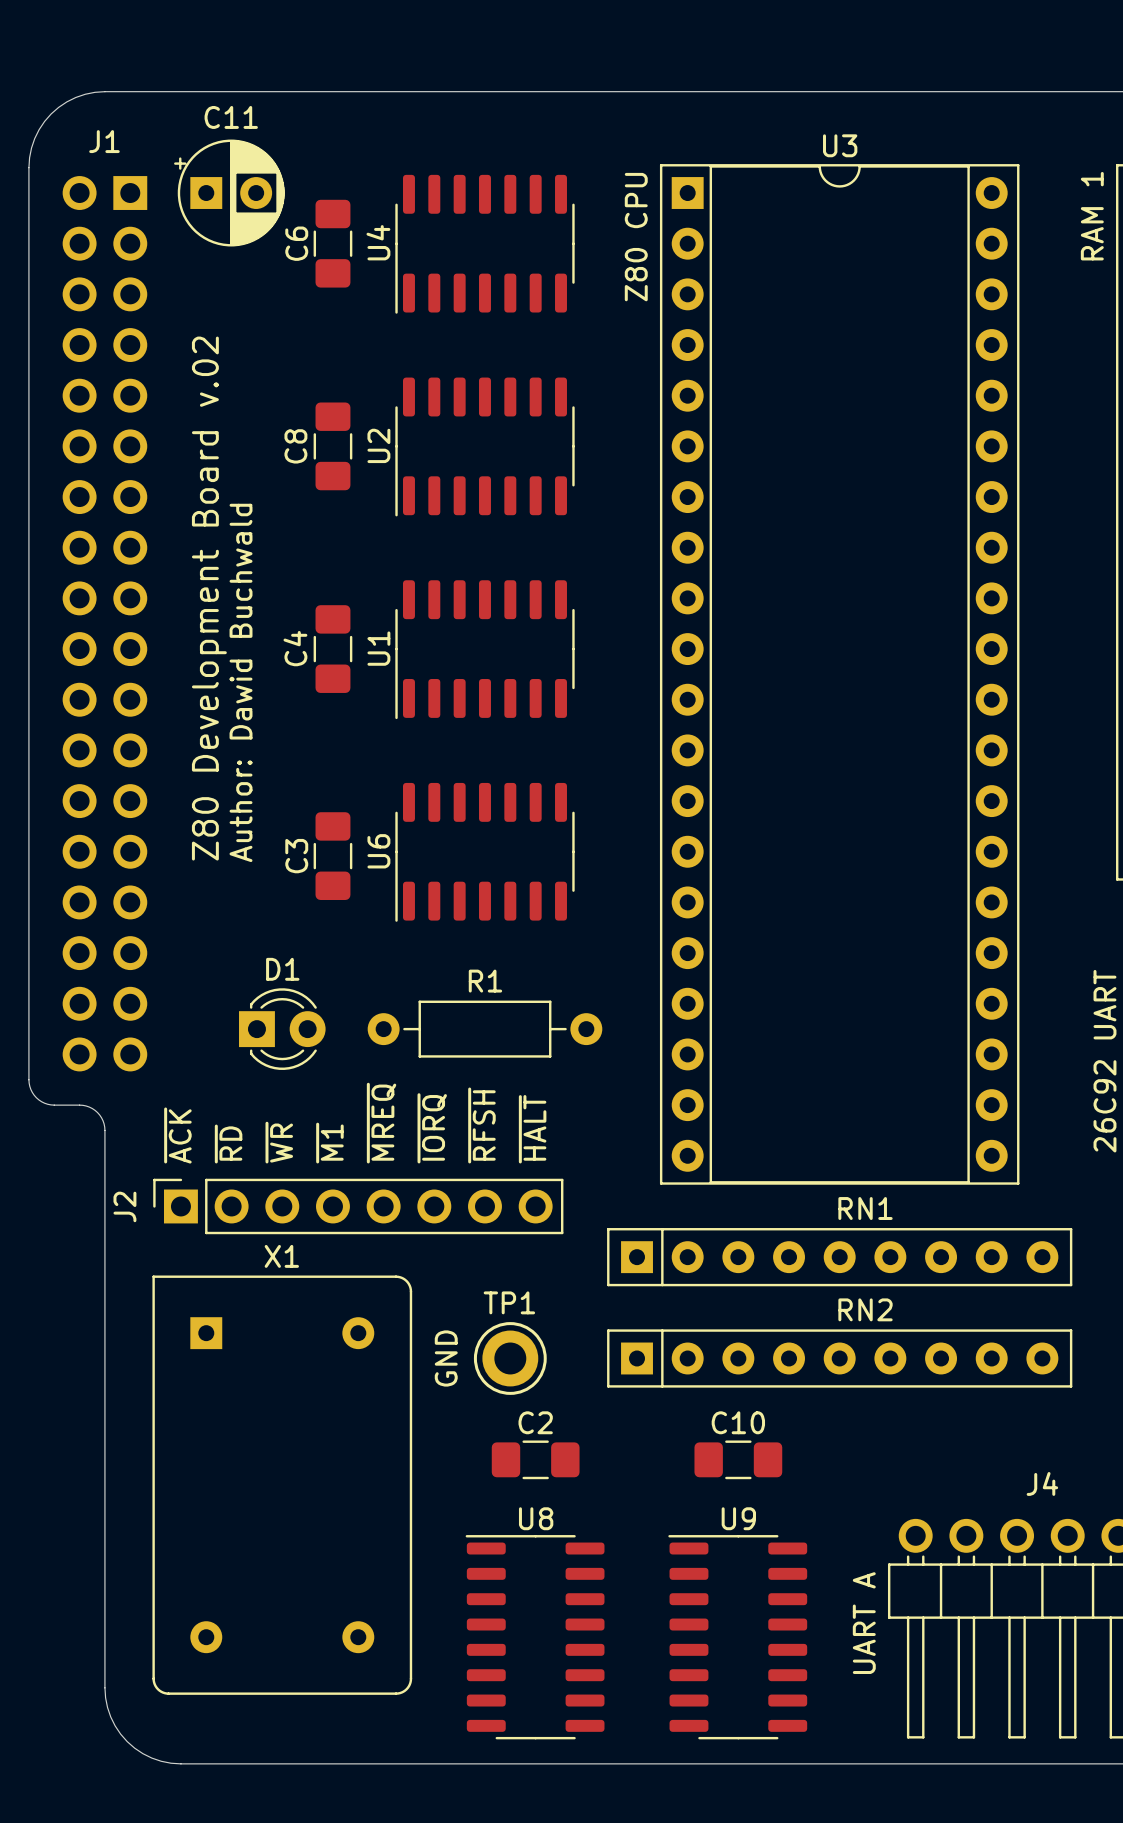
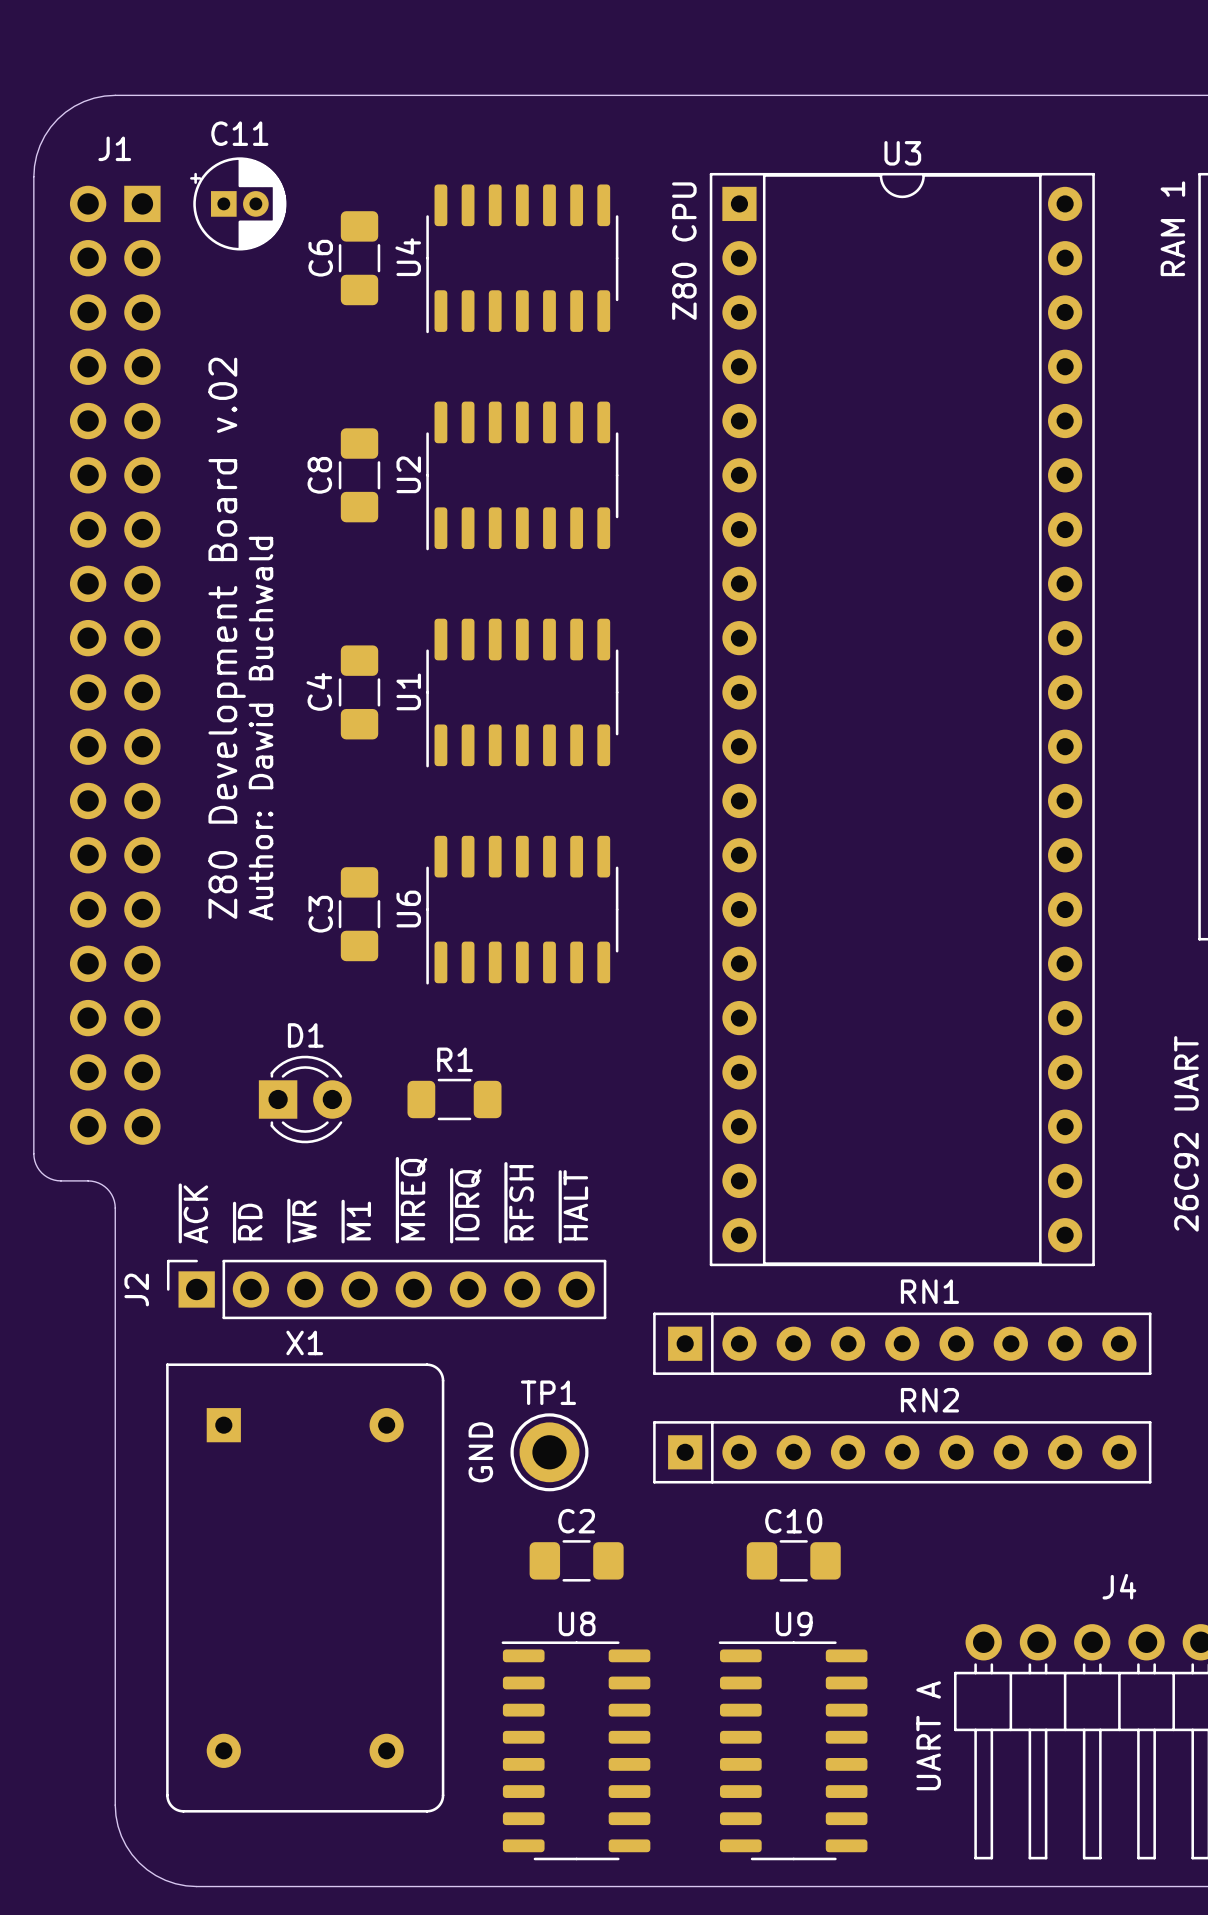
C11 footprint: [174, 139, 285, 247] -> [190, 157, 287, 251]
R1 footprint: [367, 1000, 603, 1058] -> [407, 1078, 502, 1121]

